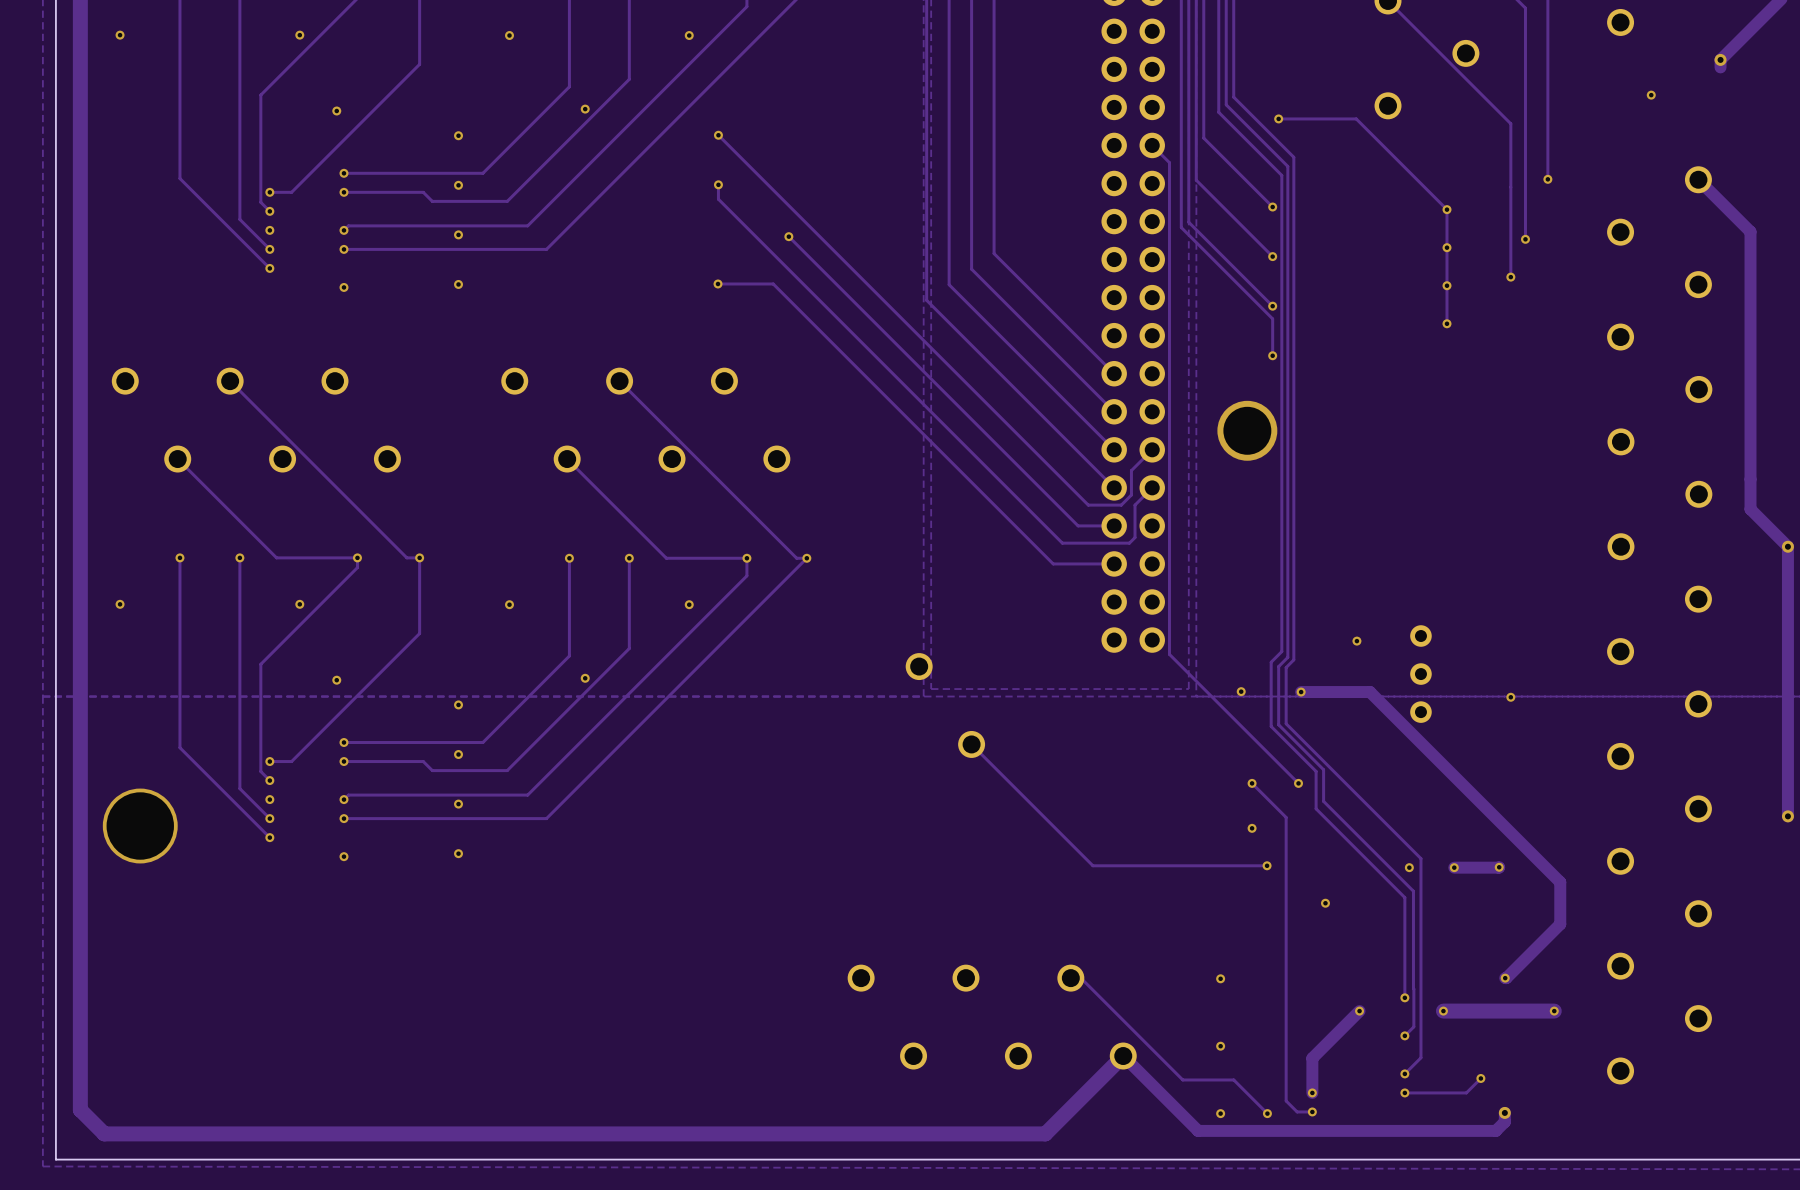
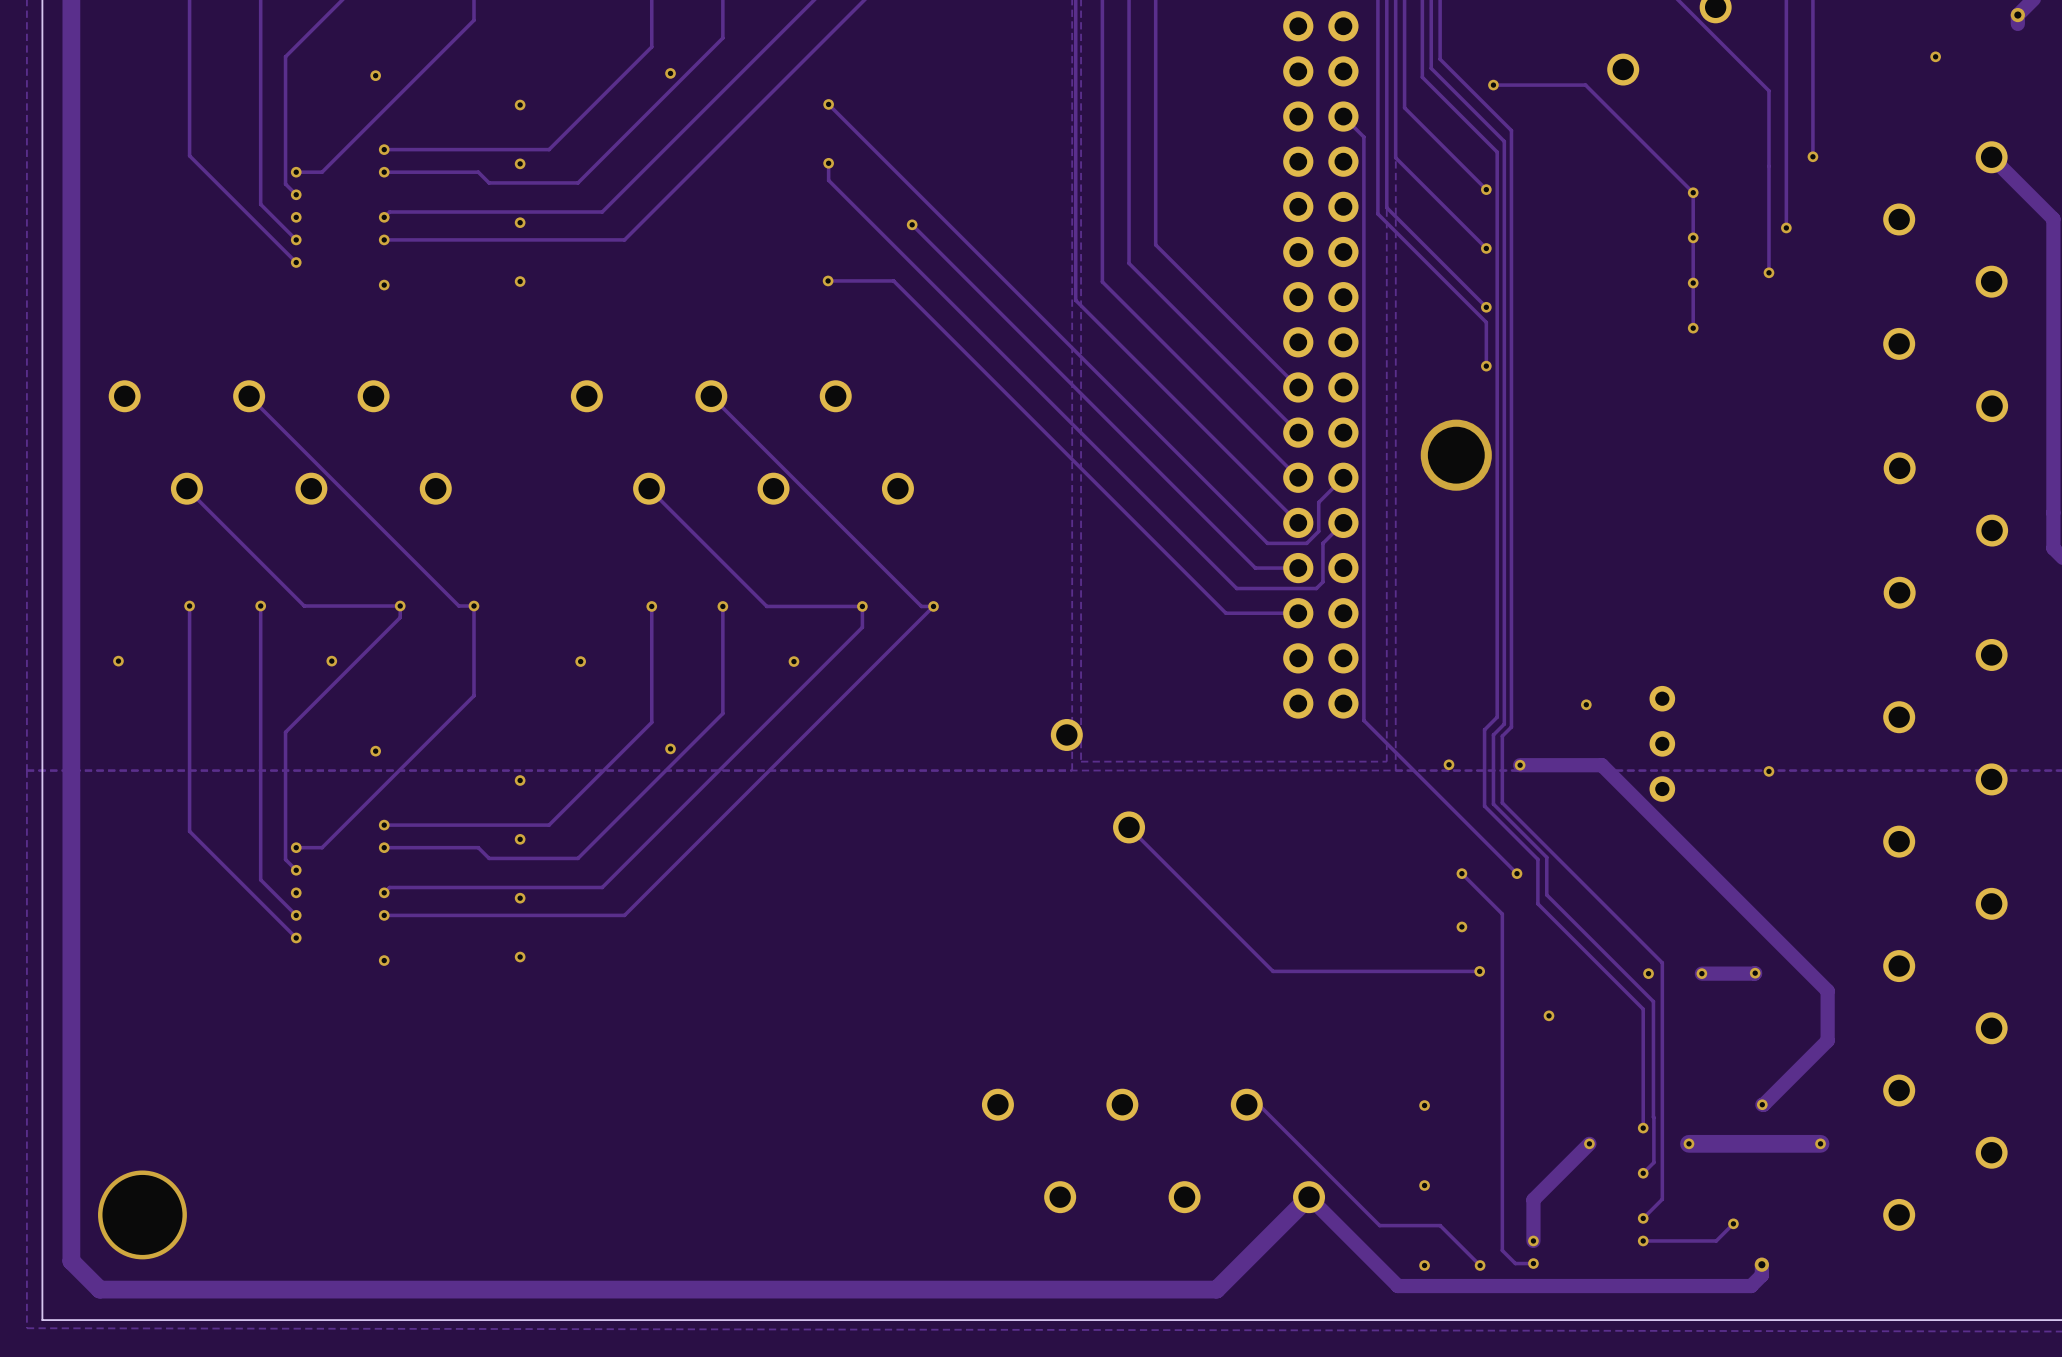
via: (140, 826) -> none
via: none -> (142, 1214)

